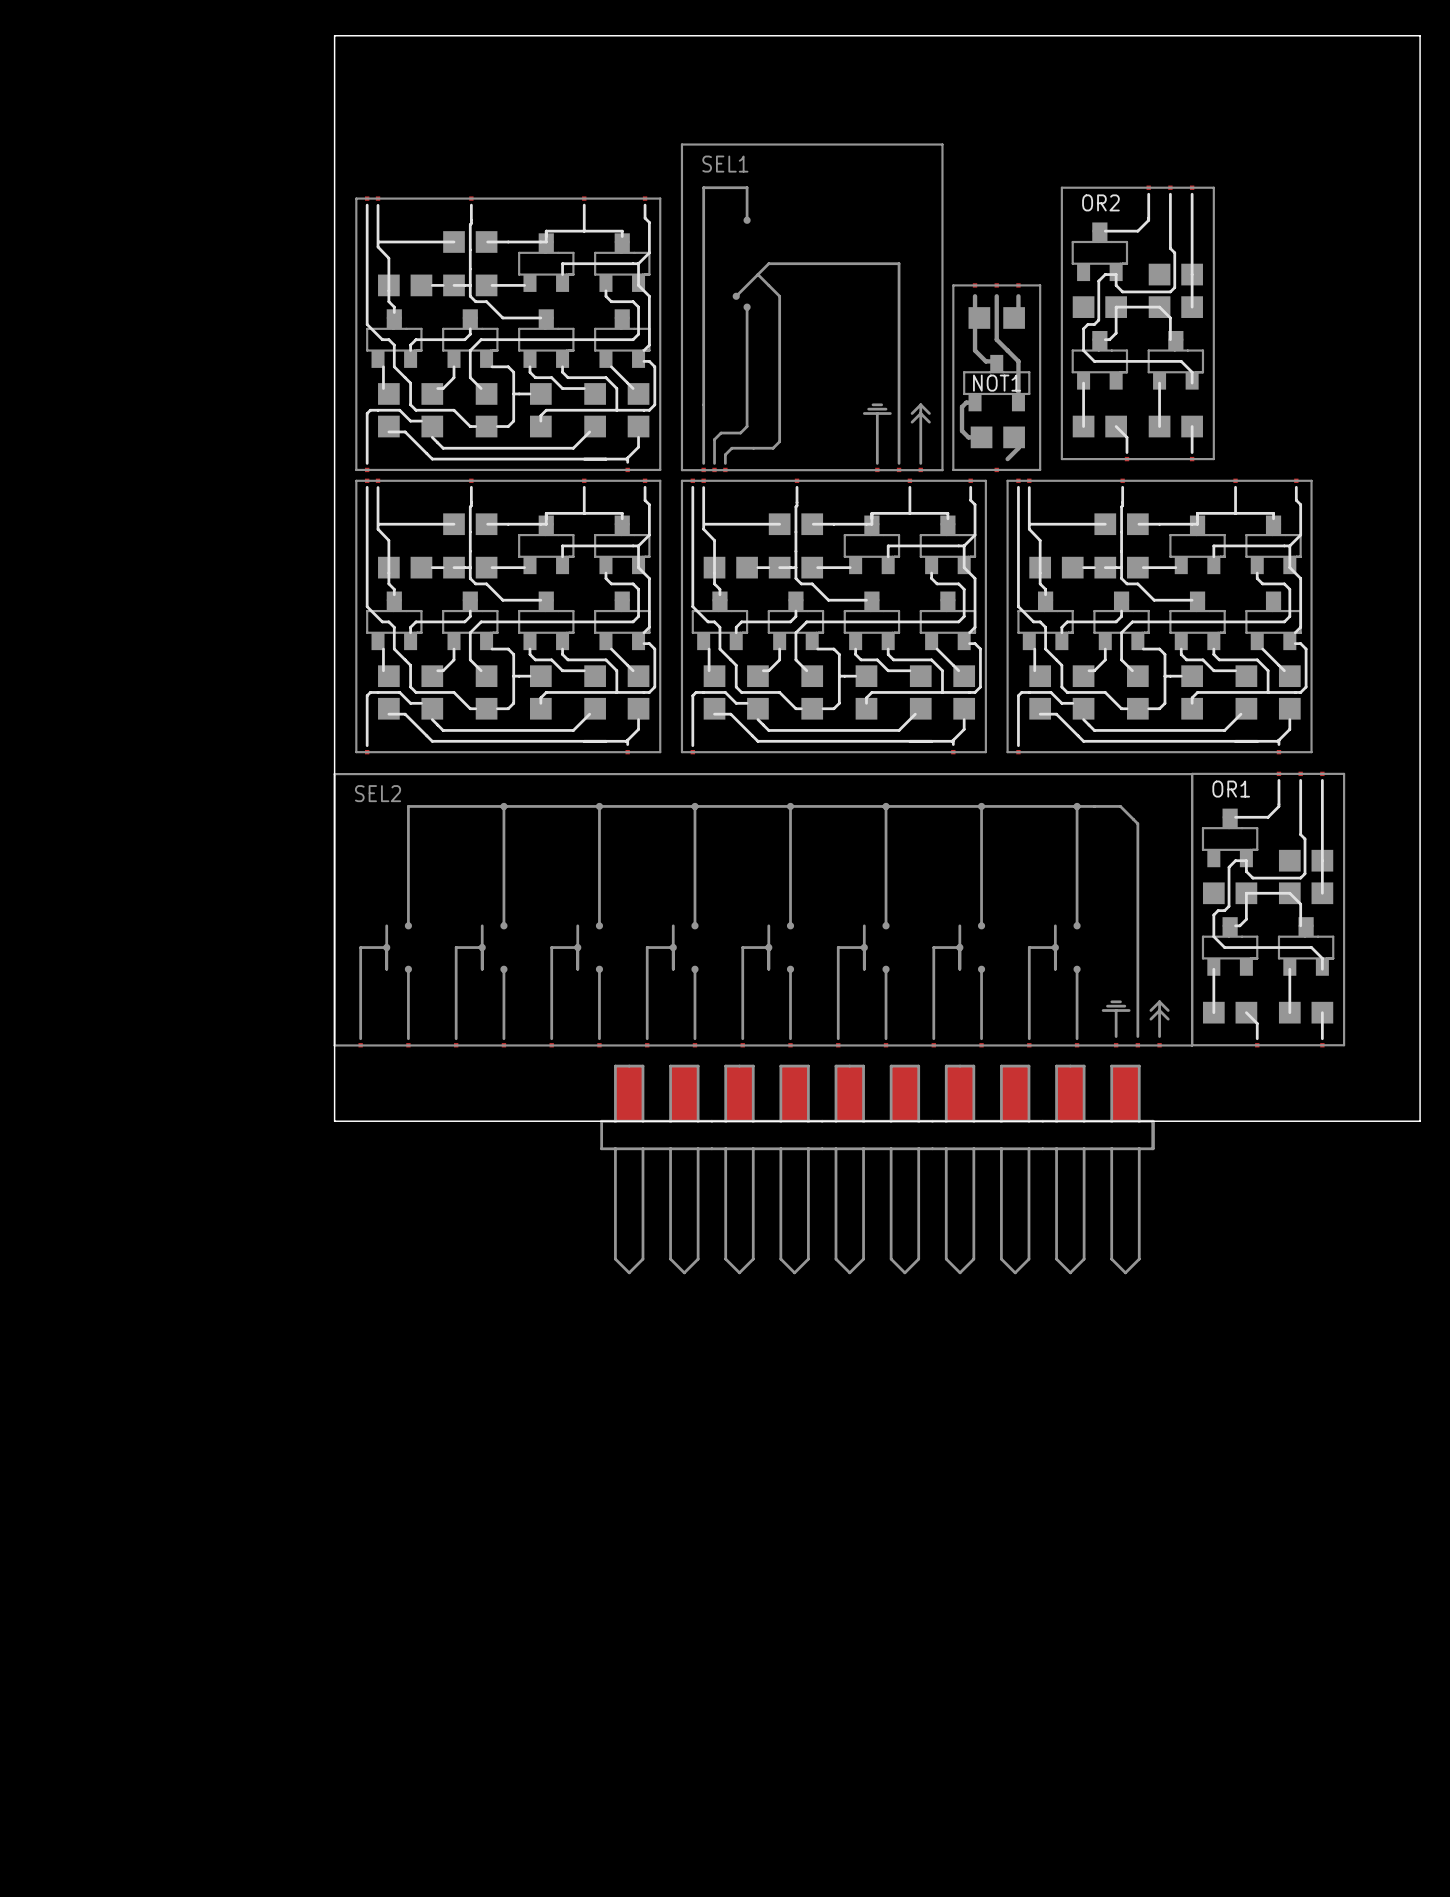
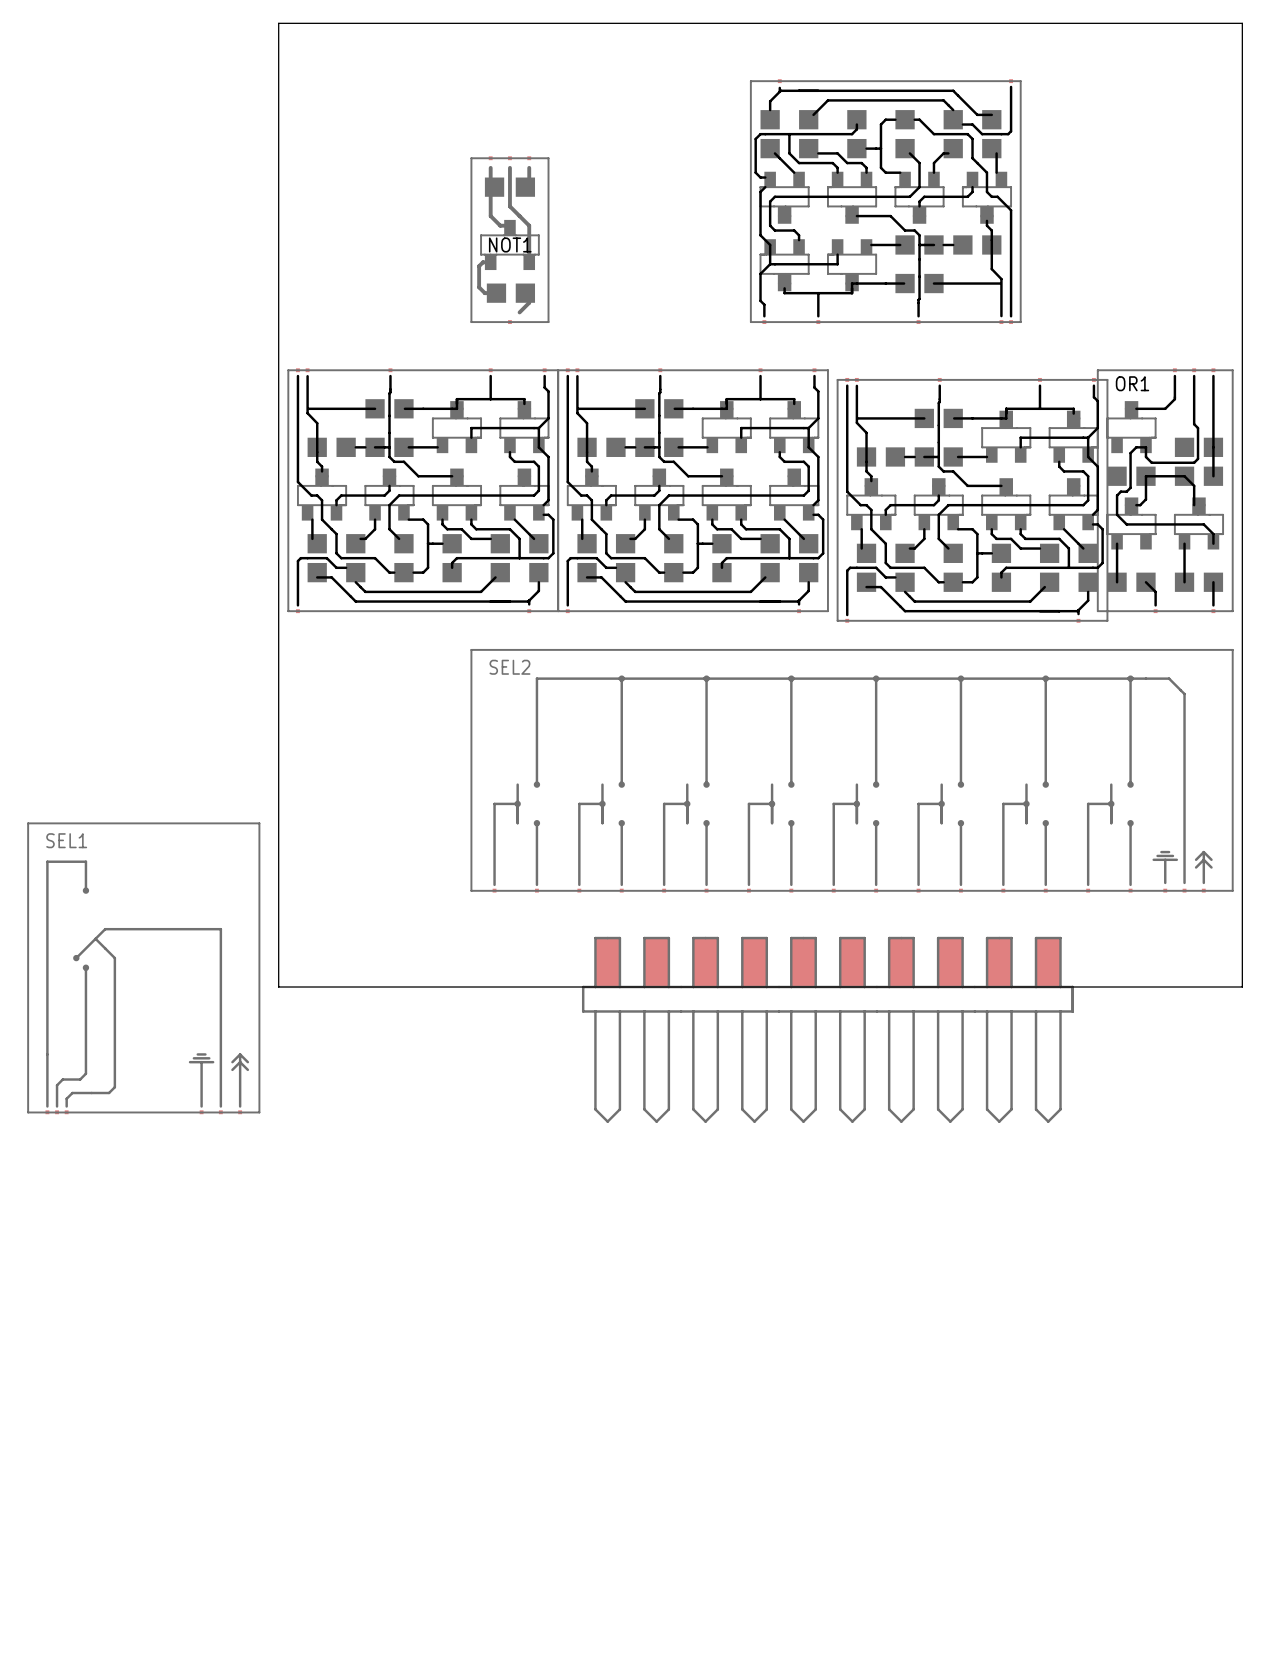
part: none -> (885, 201)
SEL1 position: (812, 307) -> (143, 968)
OR2: (1137, 323) -> none
part: (508, 334) -> none
NOT1 position: (996, 377) -> (509, 240)
part position: (508, 616) -> (423, 490)
part position: (833, 616) -> (693, 490)
part position: (1159, 616) -> (972, 500)
OR1 position: (1268, 909) -> (1165, 490)
SEL2 position: (763, 910) -> (852, 770)
part position: (877, 1169) -> (827, 1029)

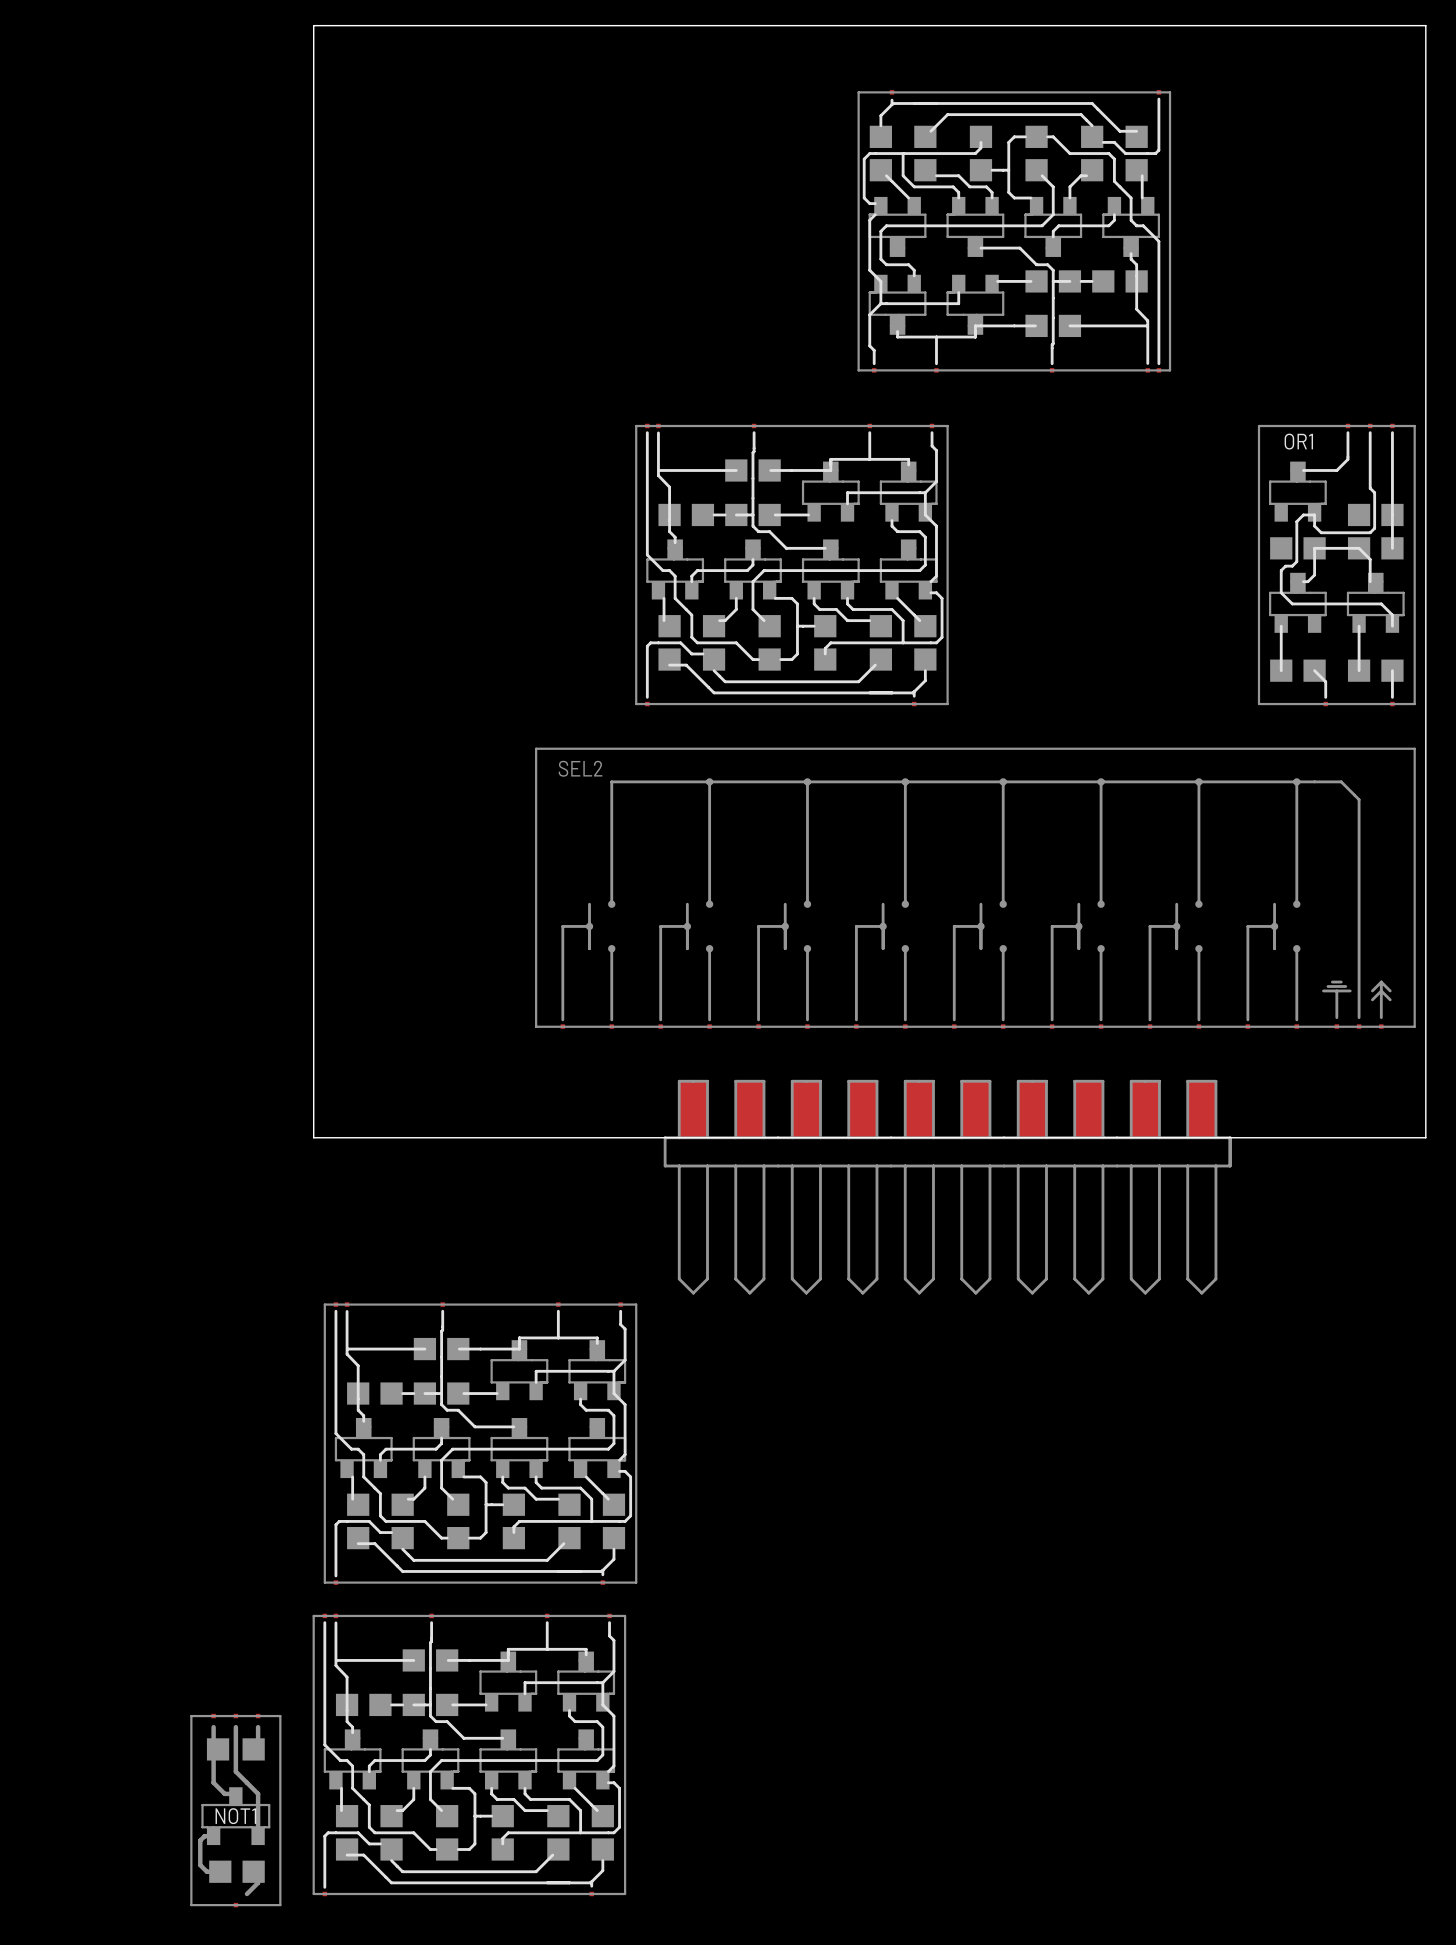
NOT1 position: (509, 240) -> (235, 1810)
part: (423, 490) -> none
part: (972, 500) -> none
SEL1: (143, 968) -> none
part: none -> (480, 1443)
part: none -> (469, 1754)

